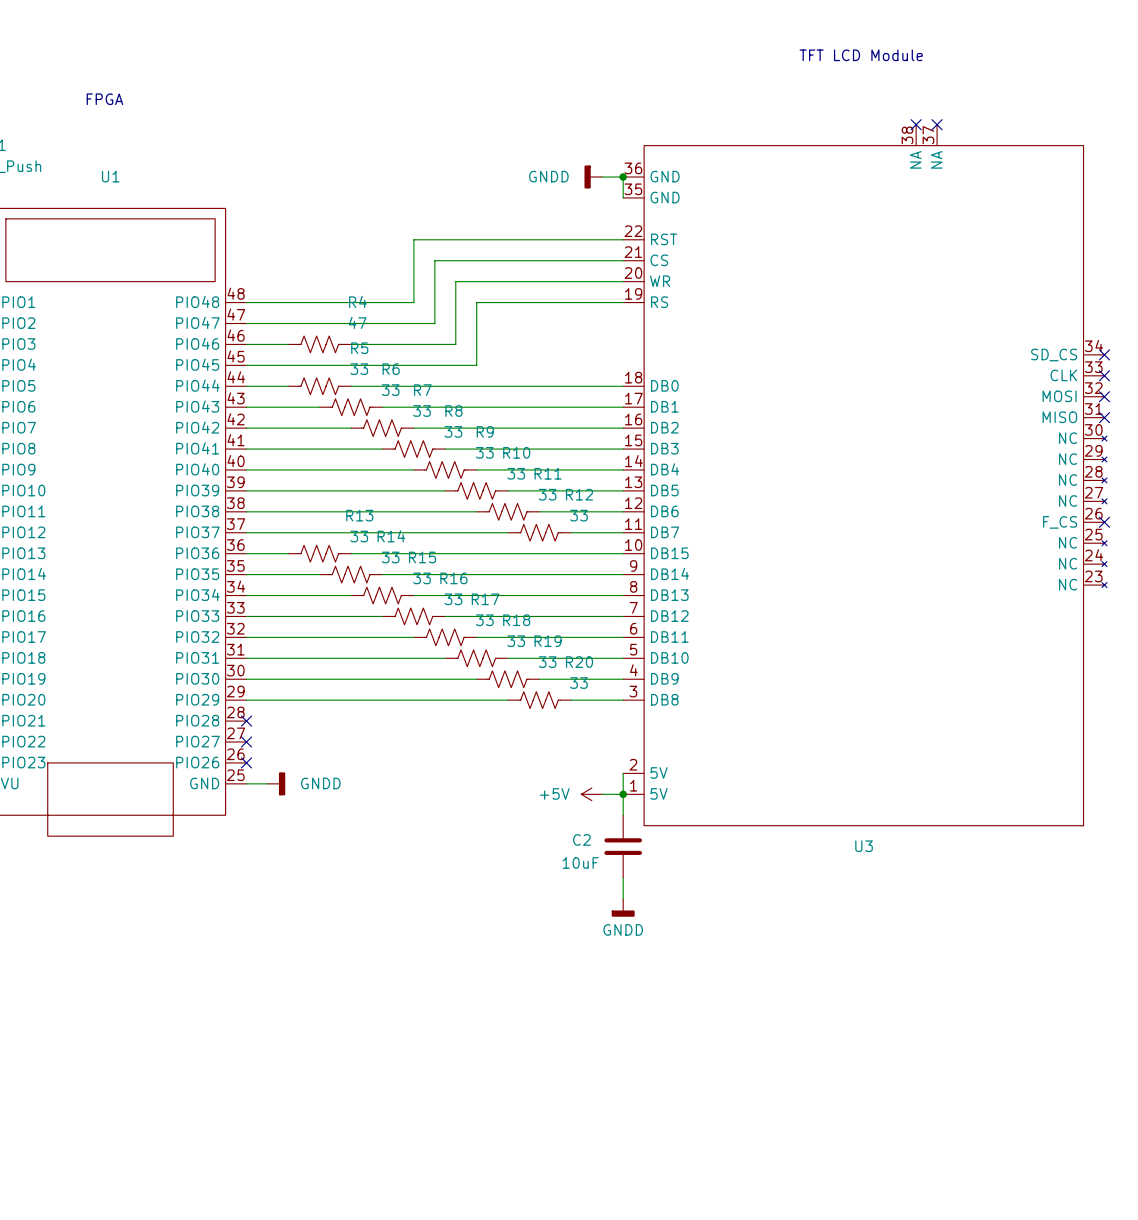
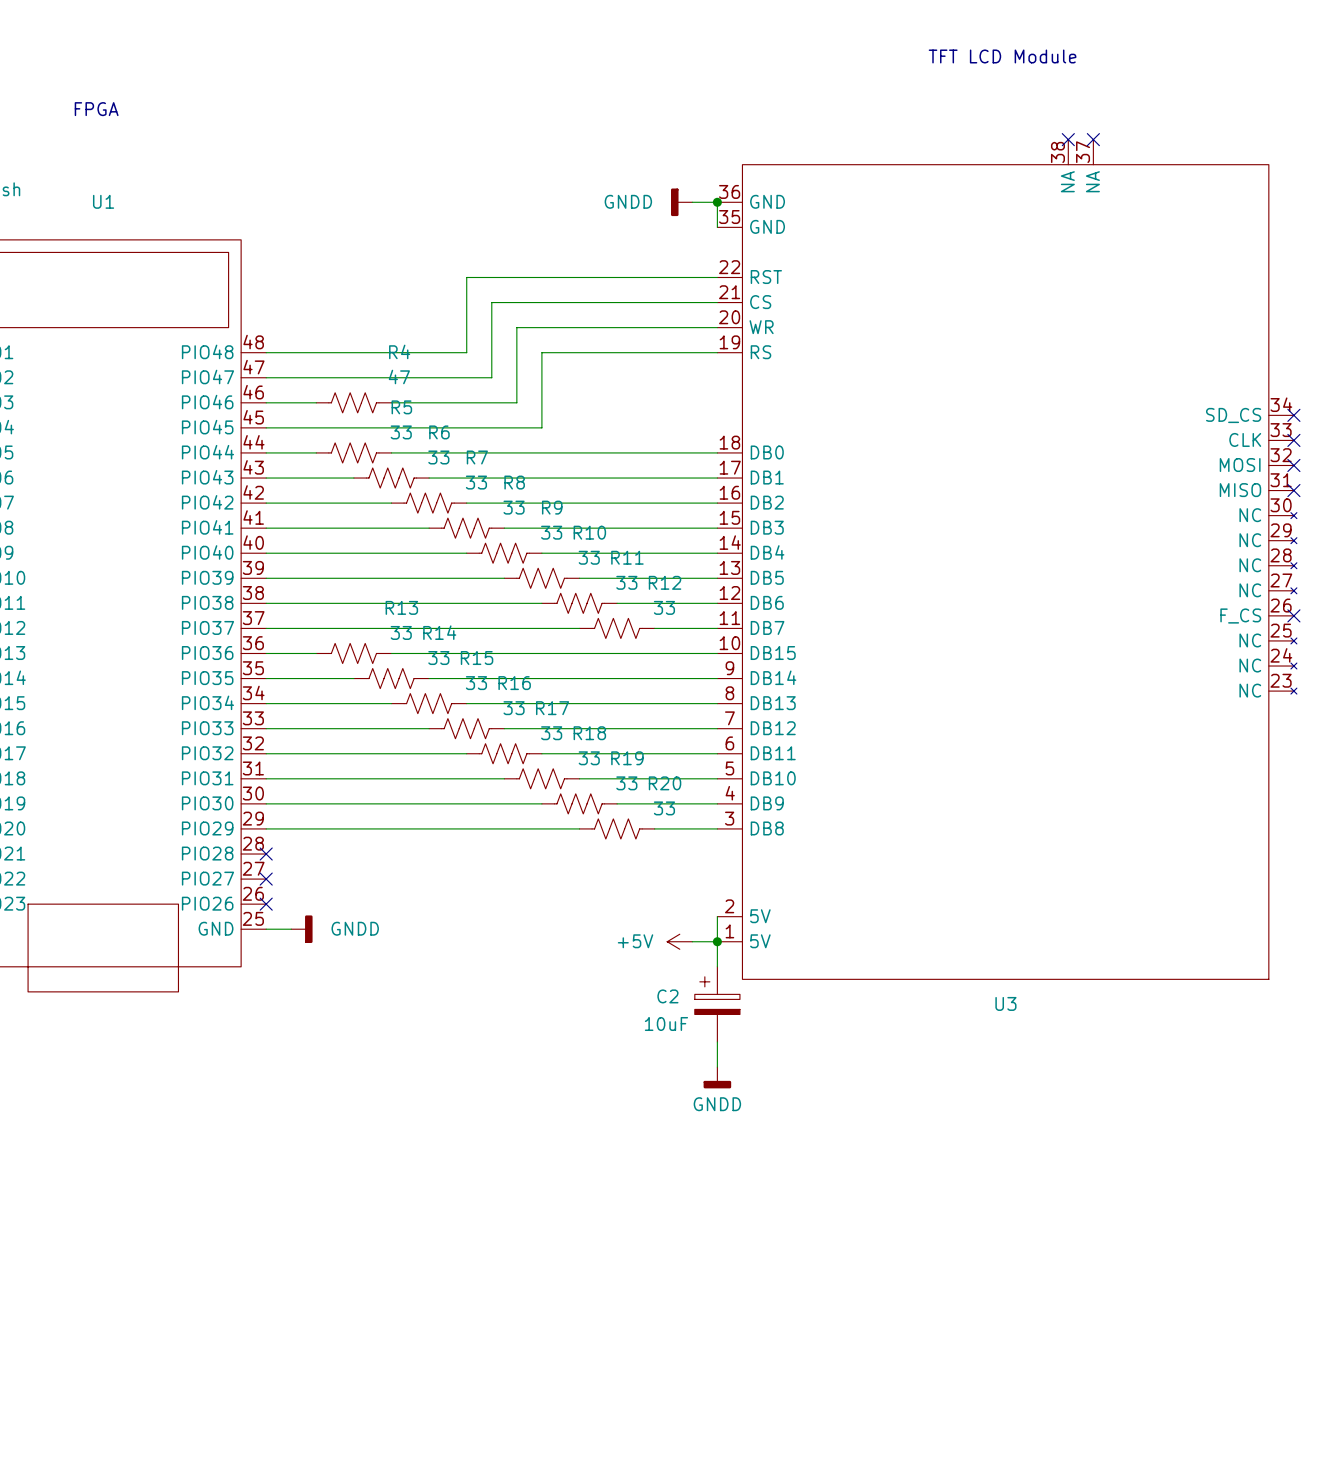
C2 symbol: [604, 815, 643, 879] -> [694, 966, 740, 1043]

